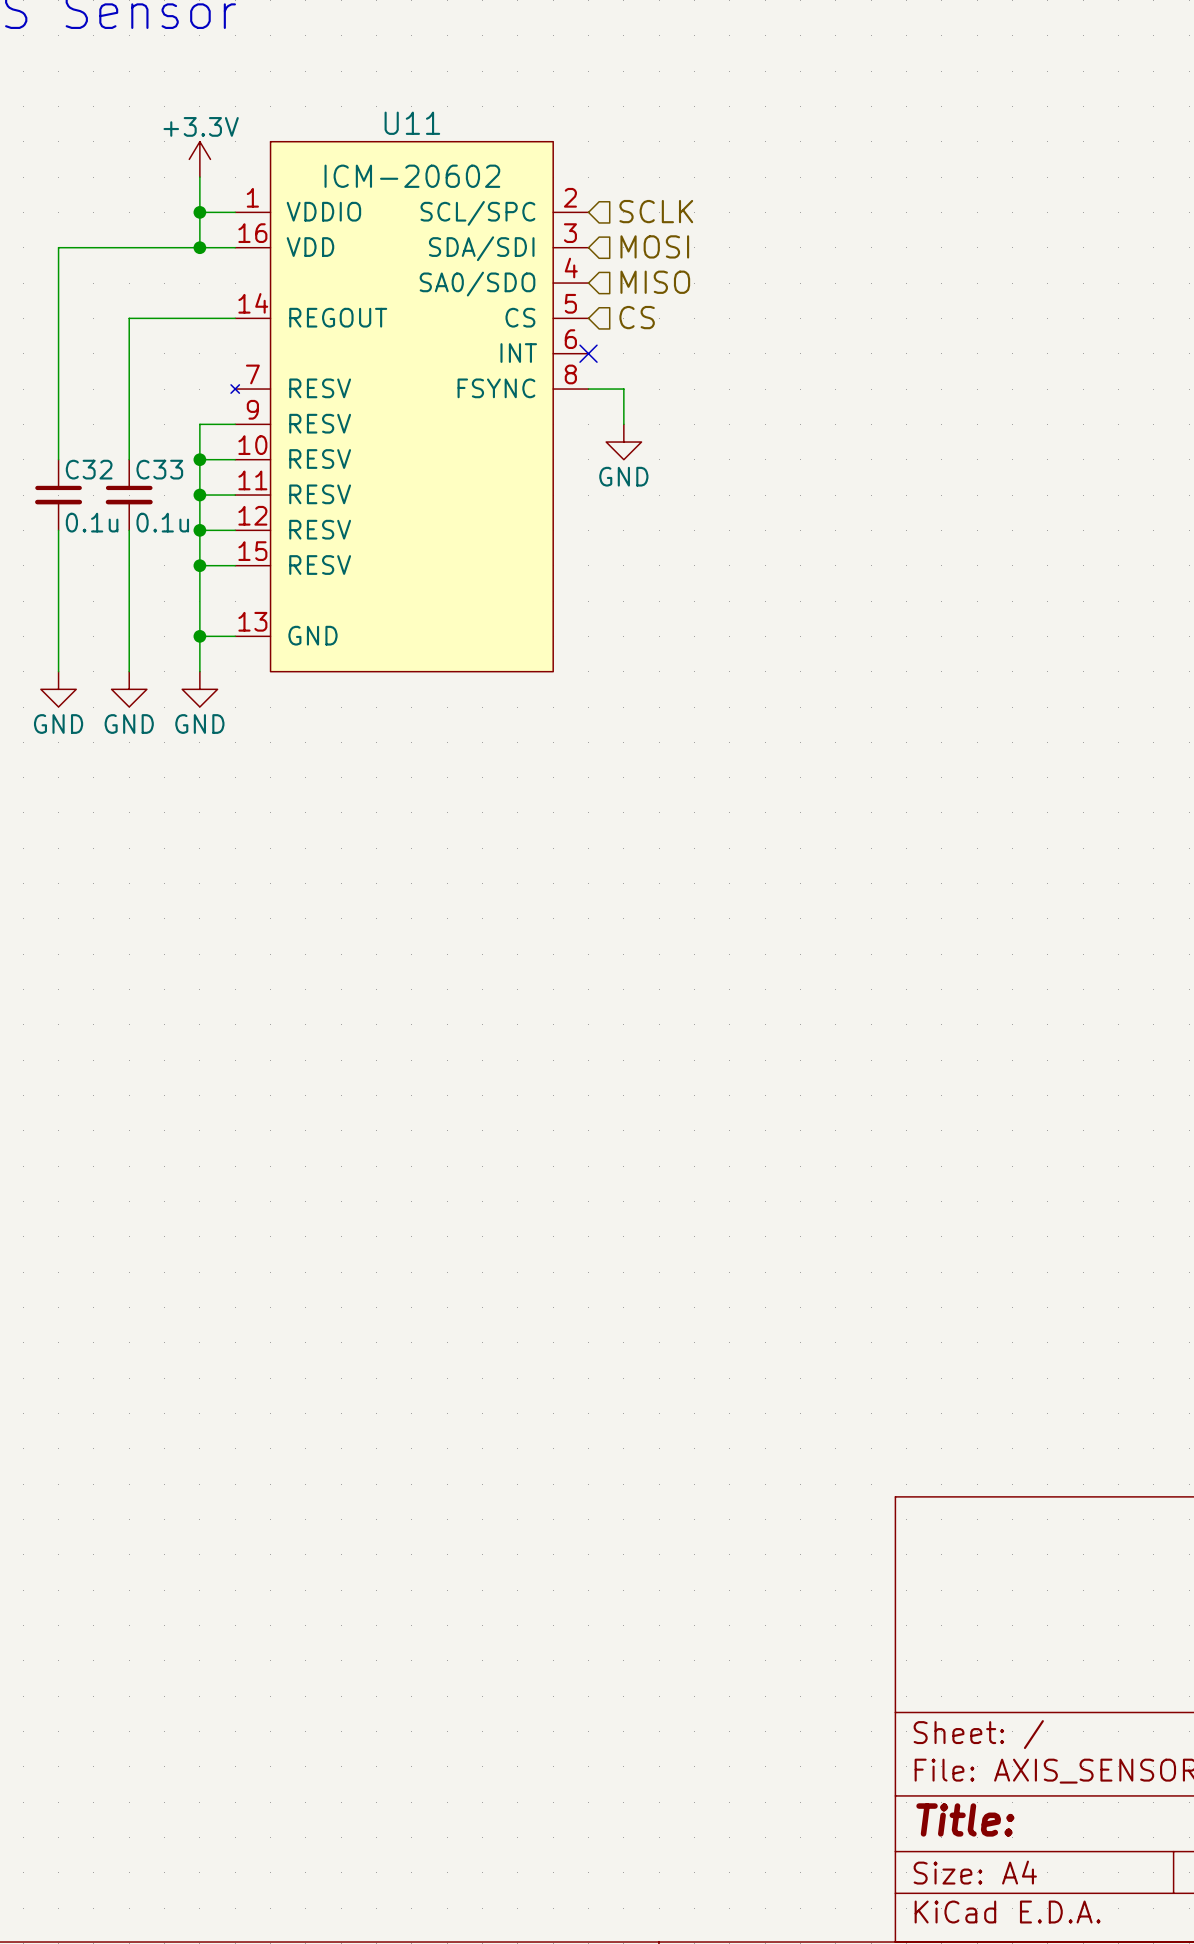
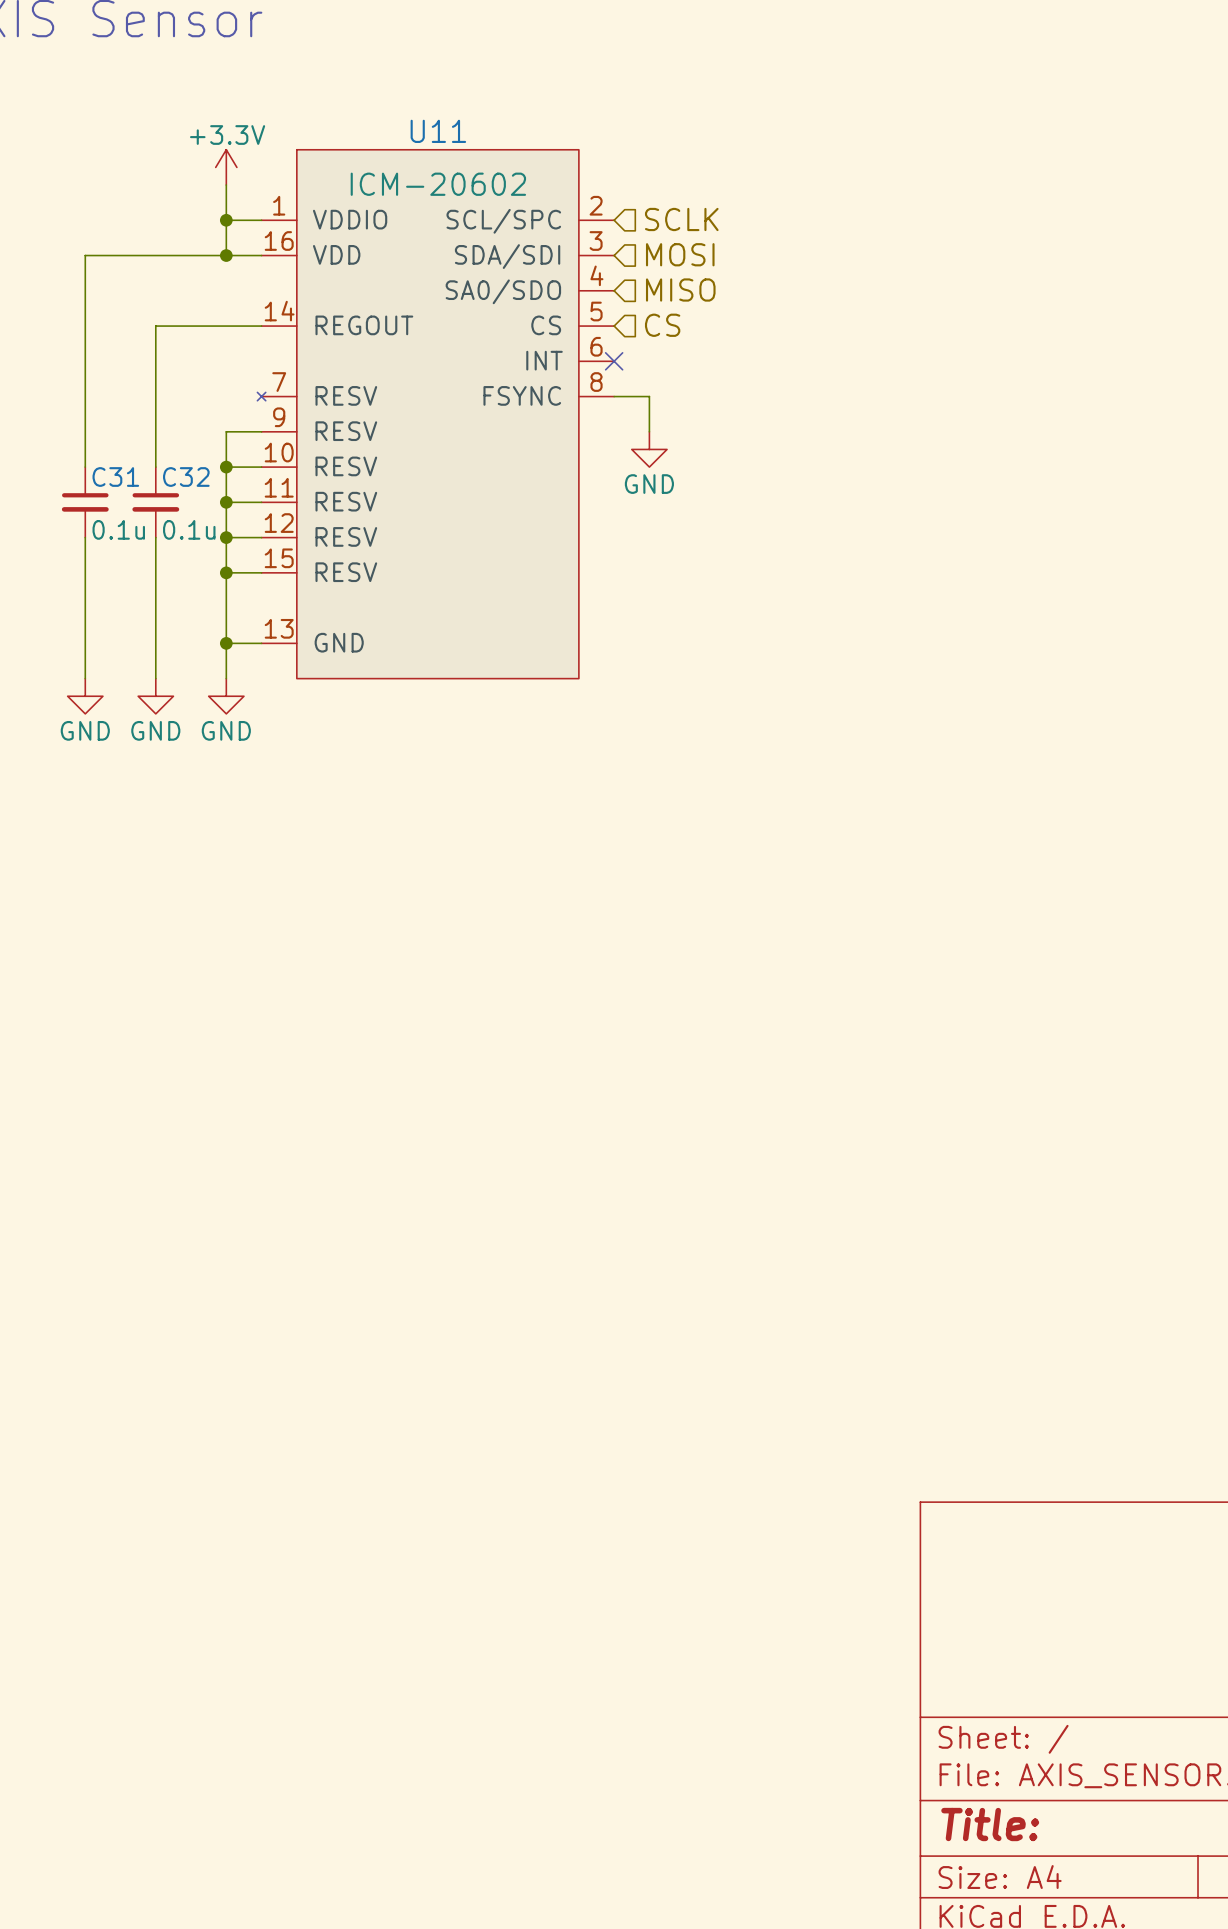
C32 name: C32 (89, 469) -> C31 (115, 477)
C33 name: C33 (159, 469) -> C32 (186, 477)

